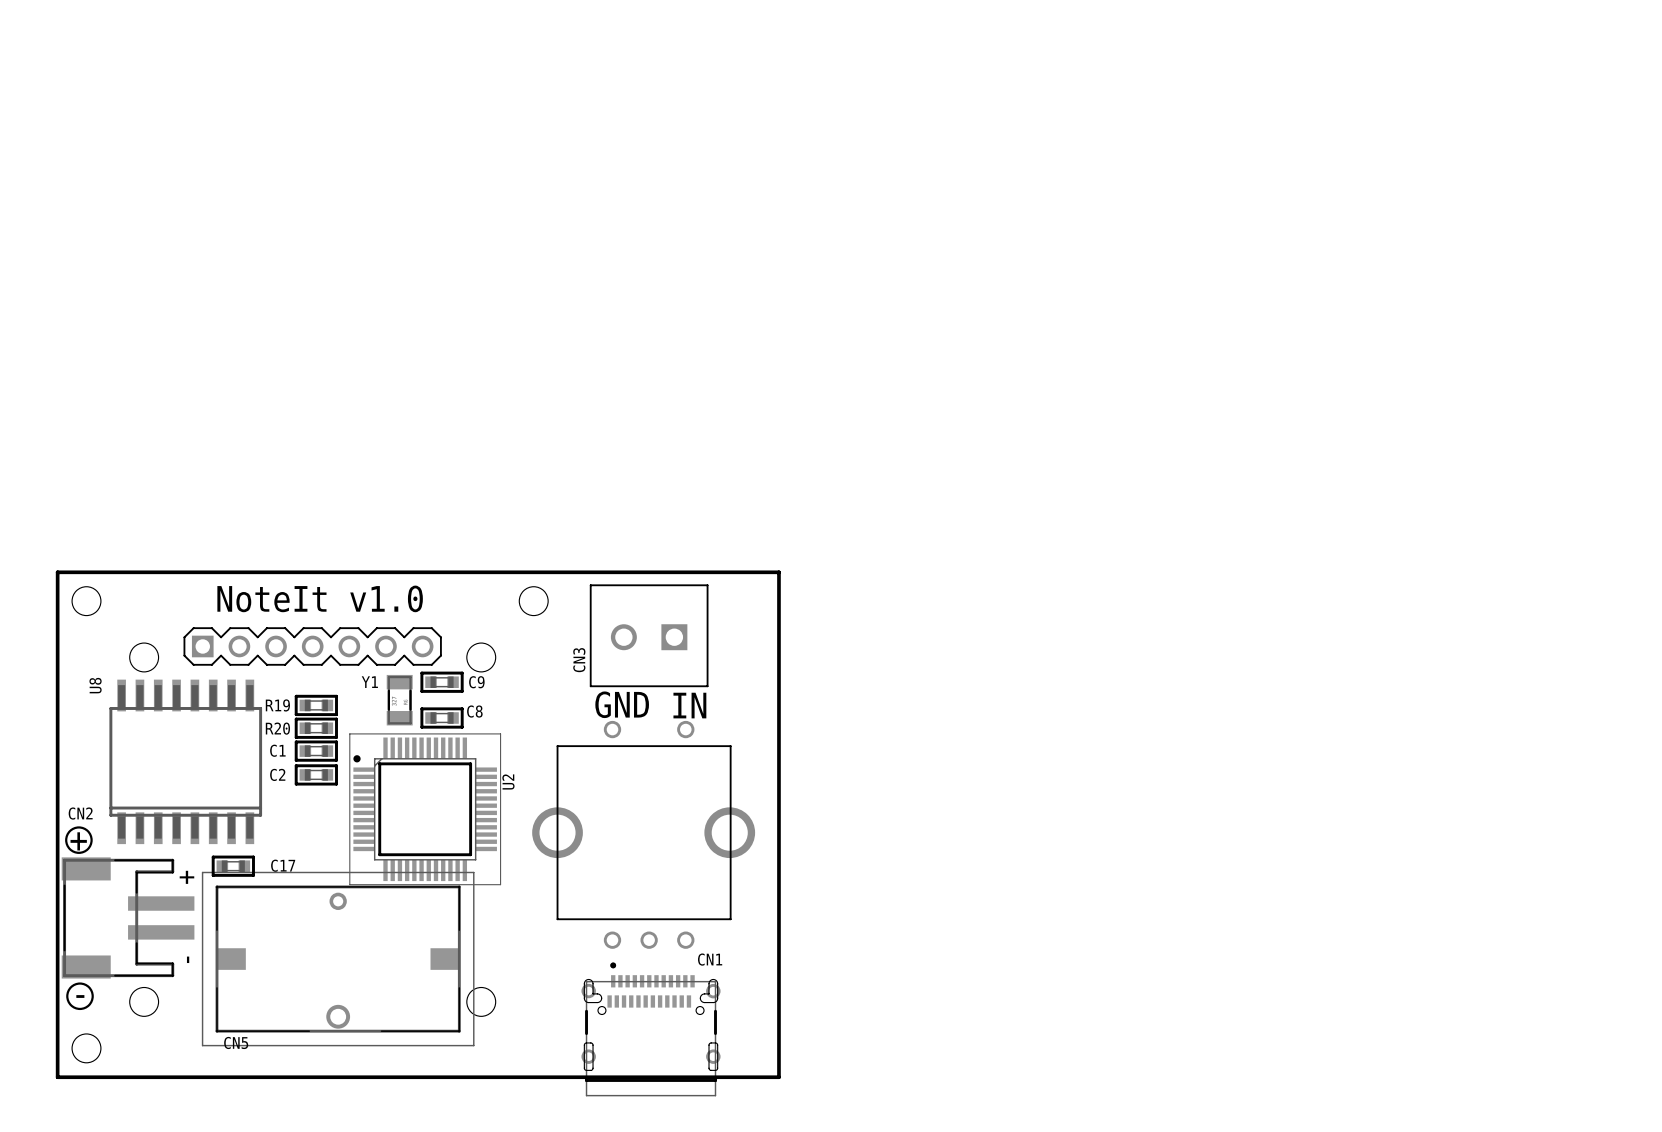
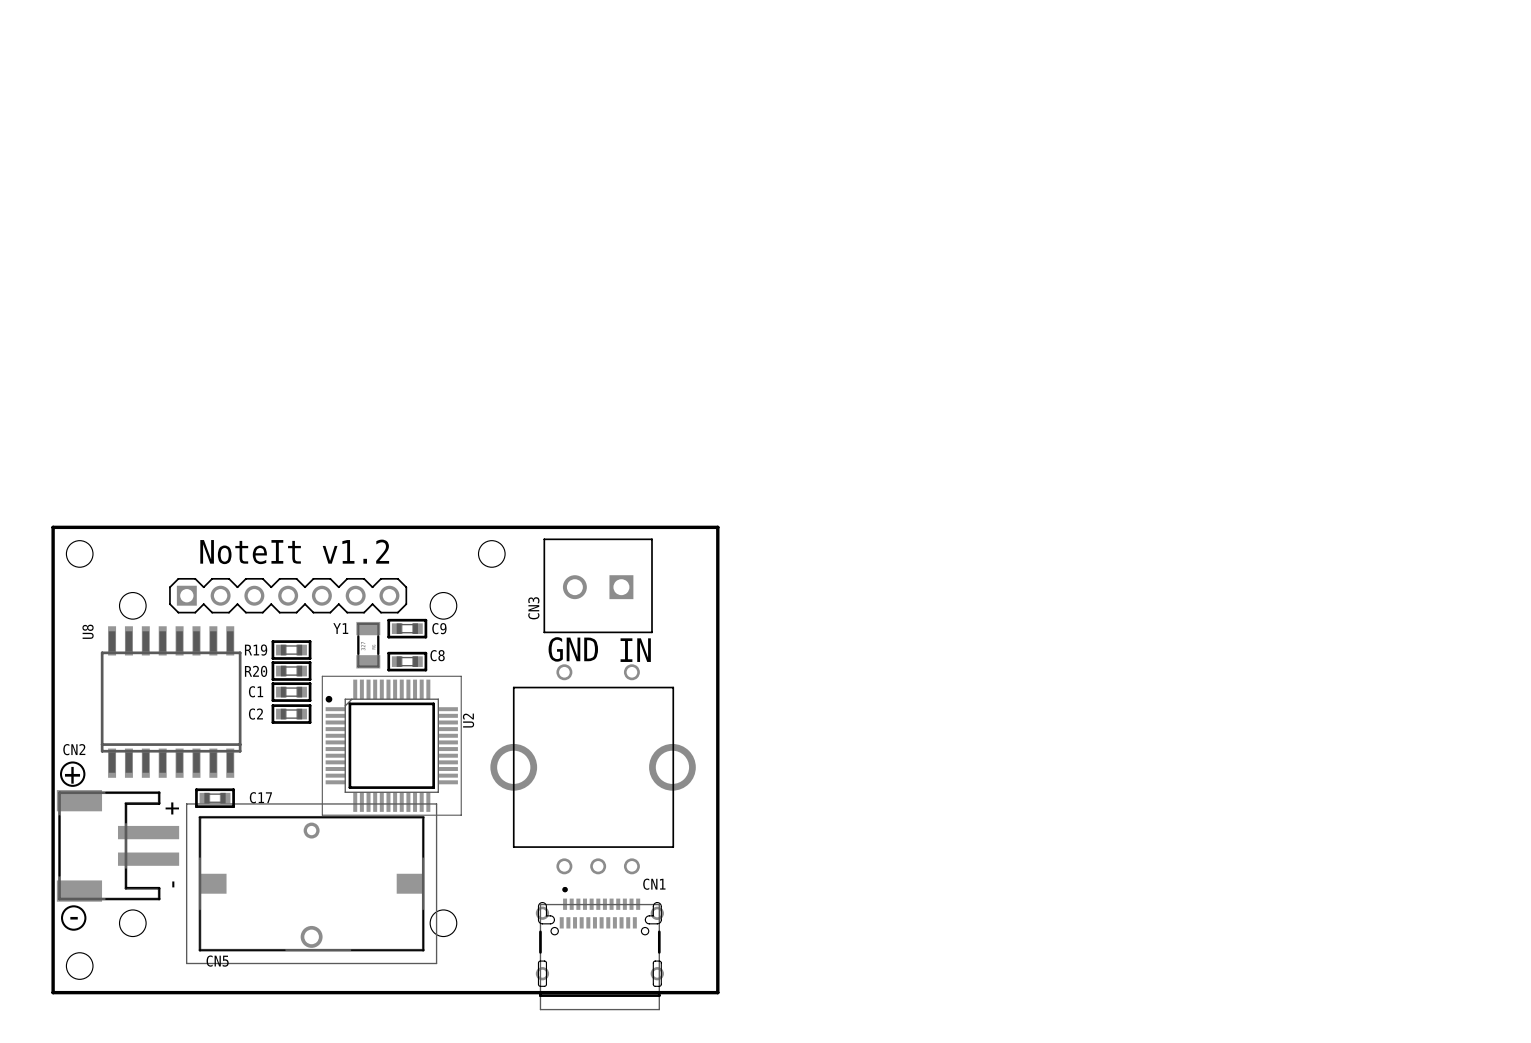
text: NoteIt v1.0 (320, 598) -> NoteIt v1.2 (294, 551)

